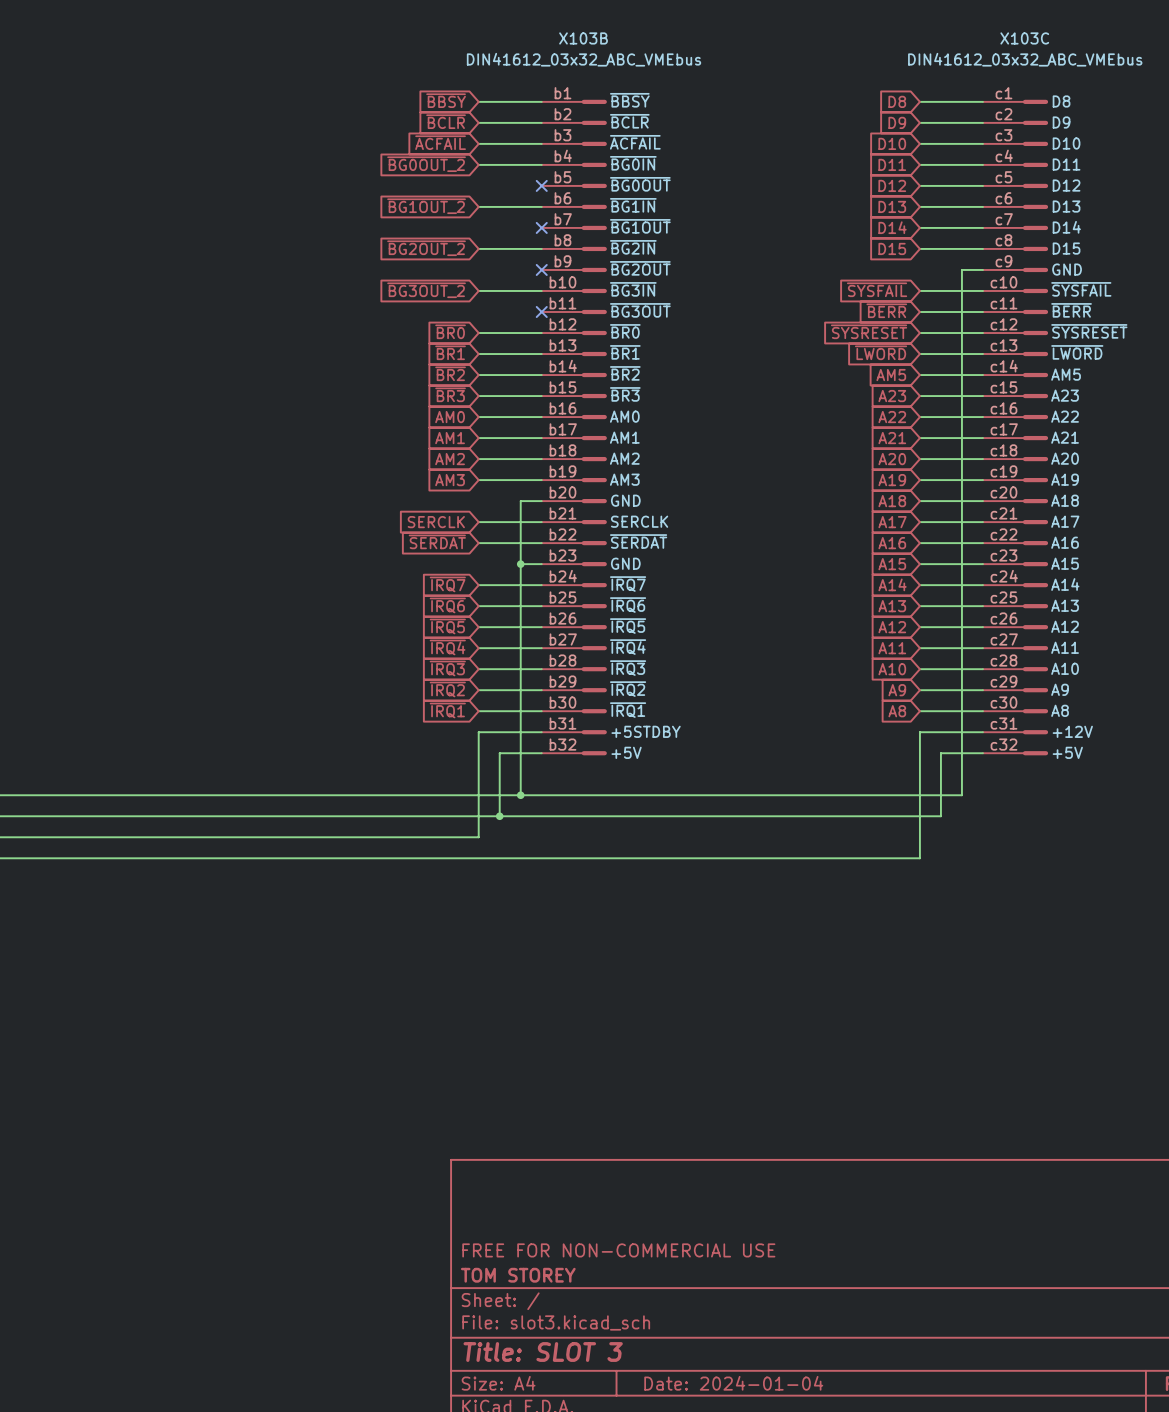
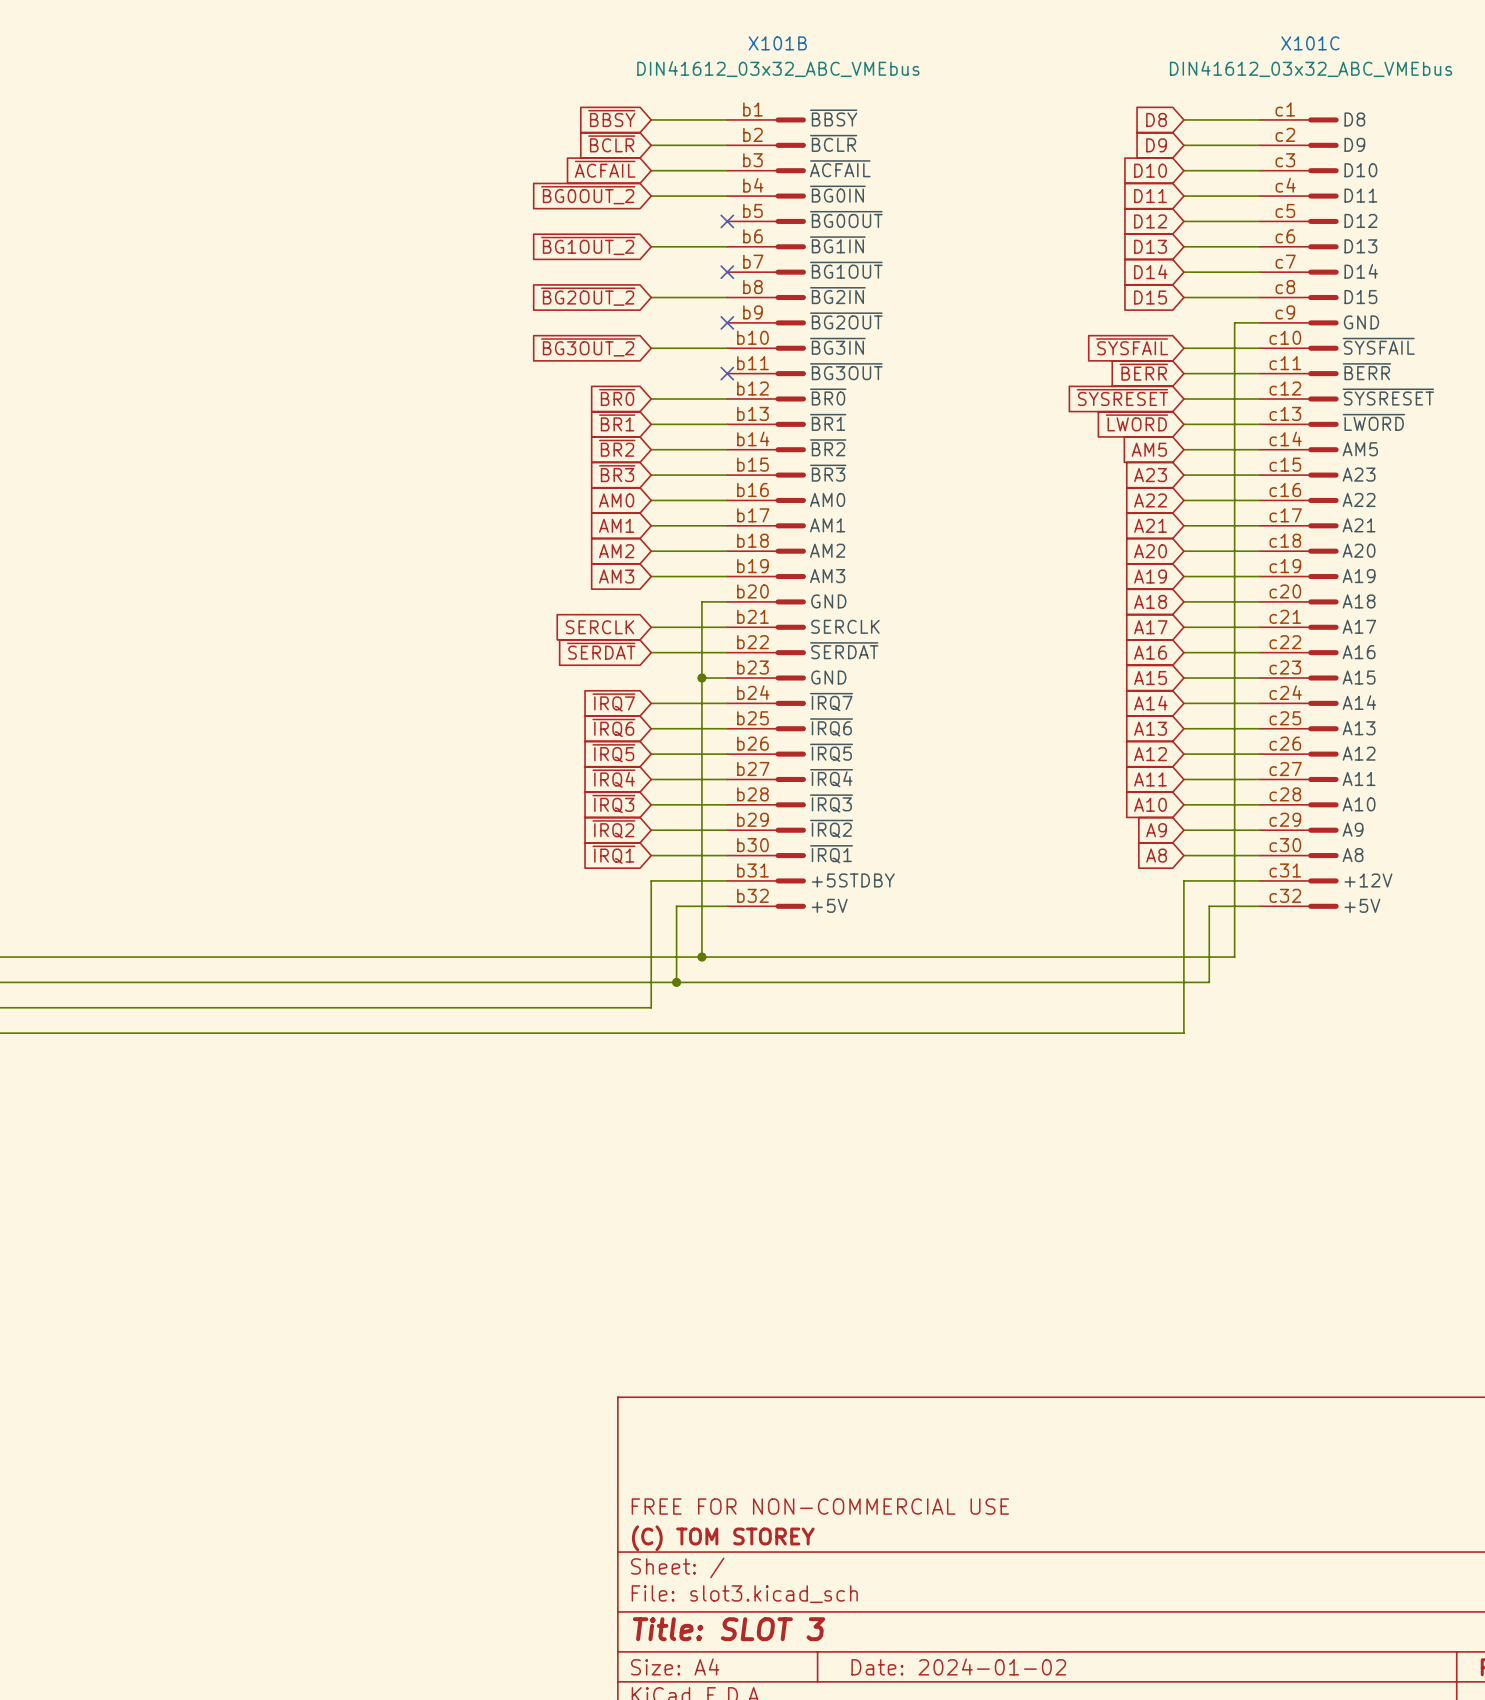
X103B name: X103B (583, 38) -> X101B (777, 43)
X103C name: X103C (1024, 38) -> X101C (1310, 43)
title block: TOM STOREY (518, 1275) -> (C) TOM STOREY (723, 1538)
title block: Date: 2024-01-04 (733, 1383) -> Date: 2024-01-02 (958, 1666)

